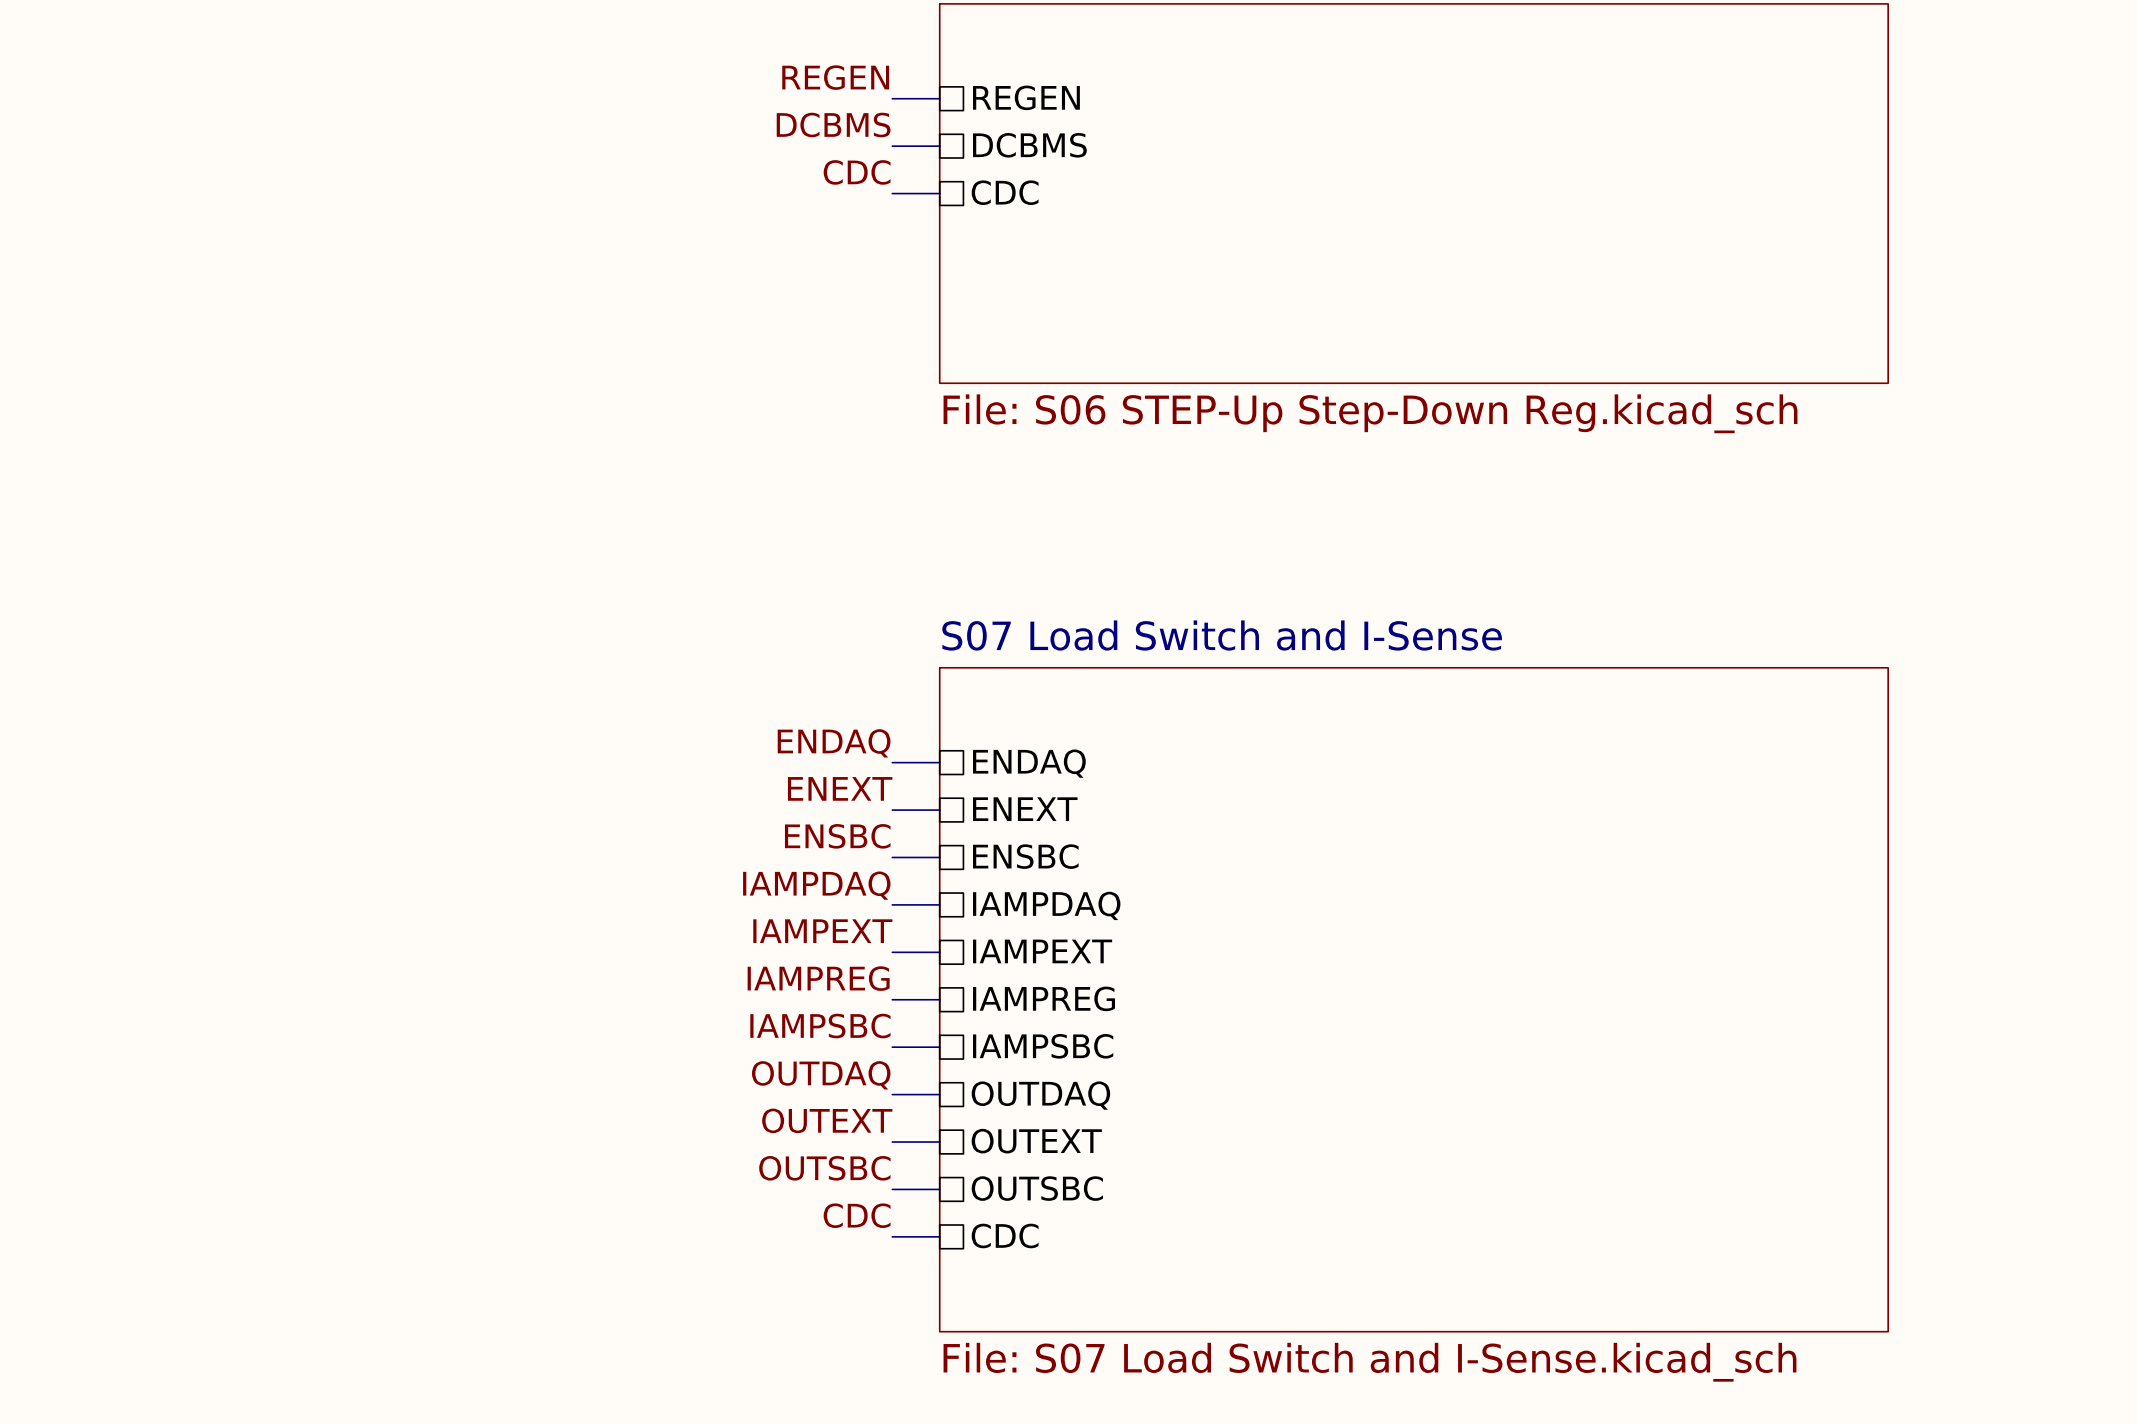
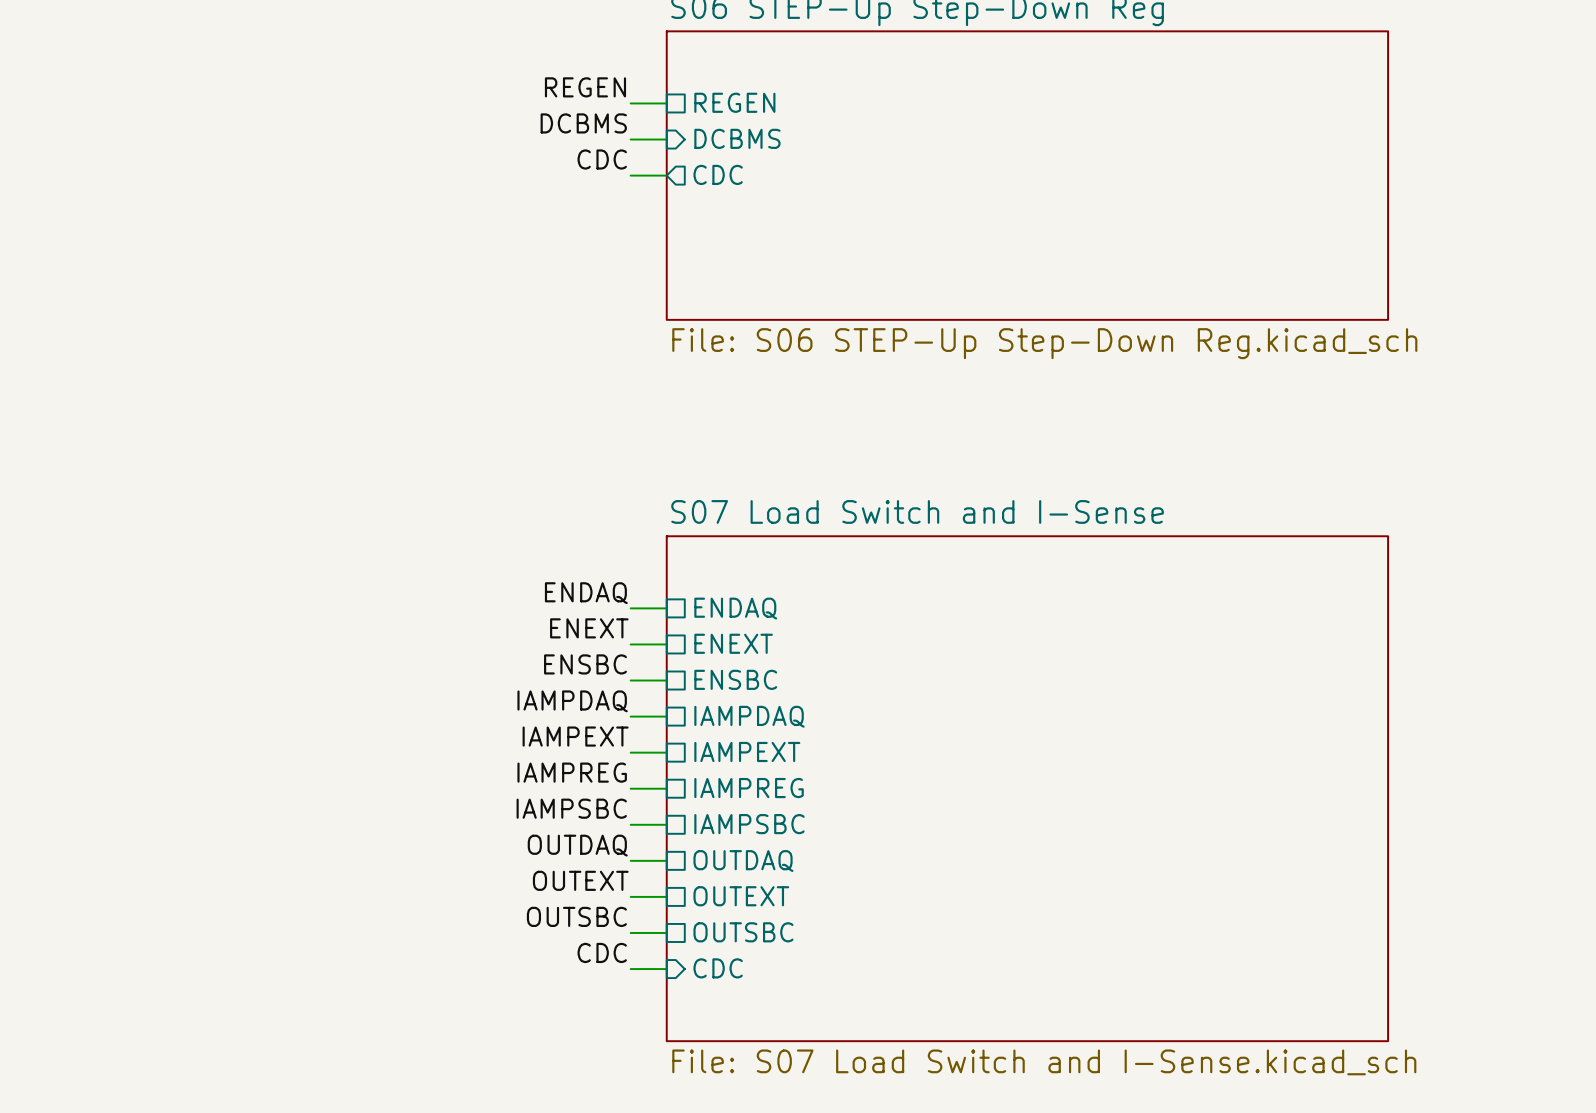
sheet pin shape: passive (1029, 145) -> input (737, 138)
sheet pin shape: passive (1005, 192) -> output (718, 174)
sheet pin shape: passive (1005, 1235) -> input (718, 968)

